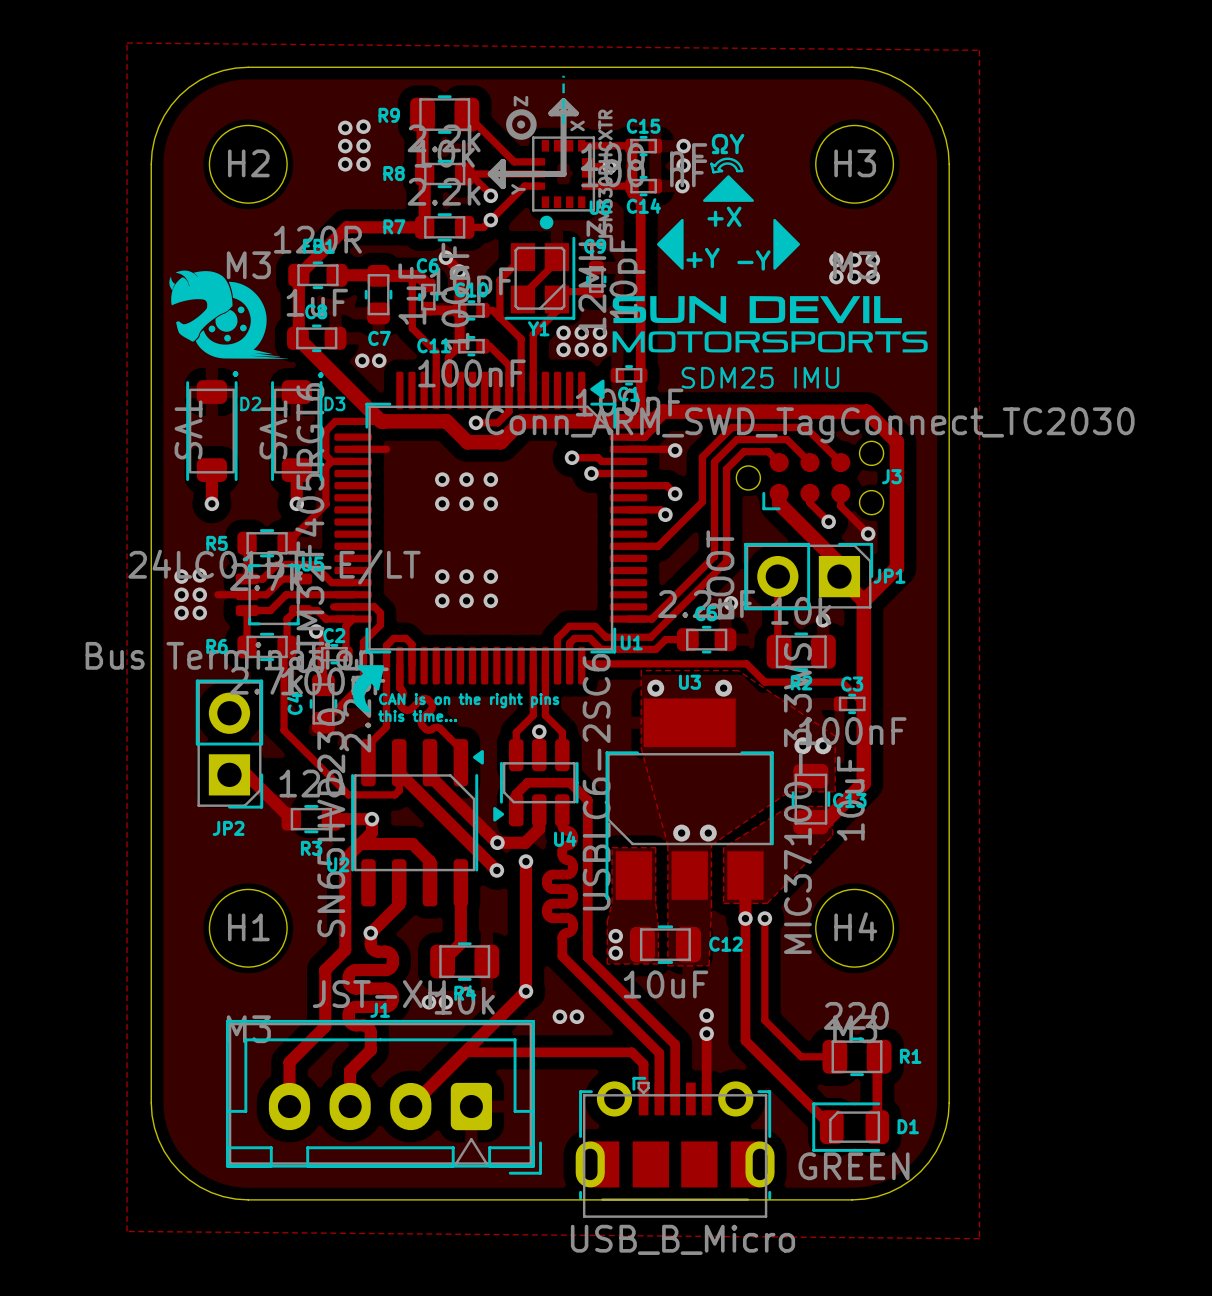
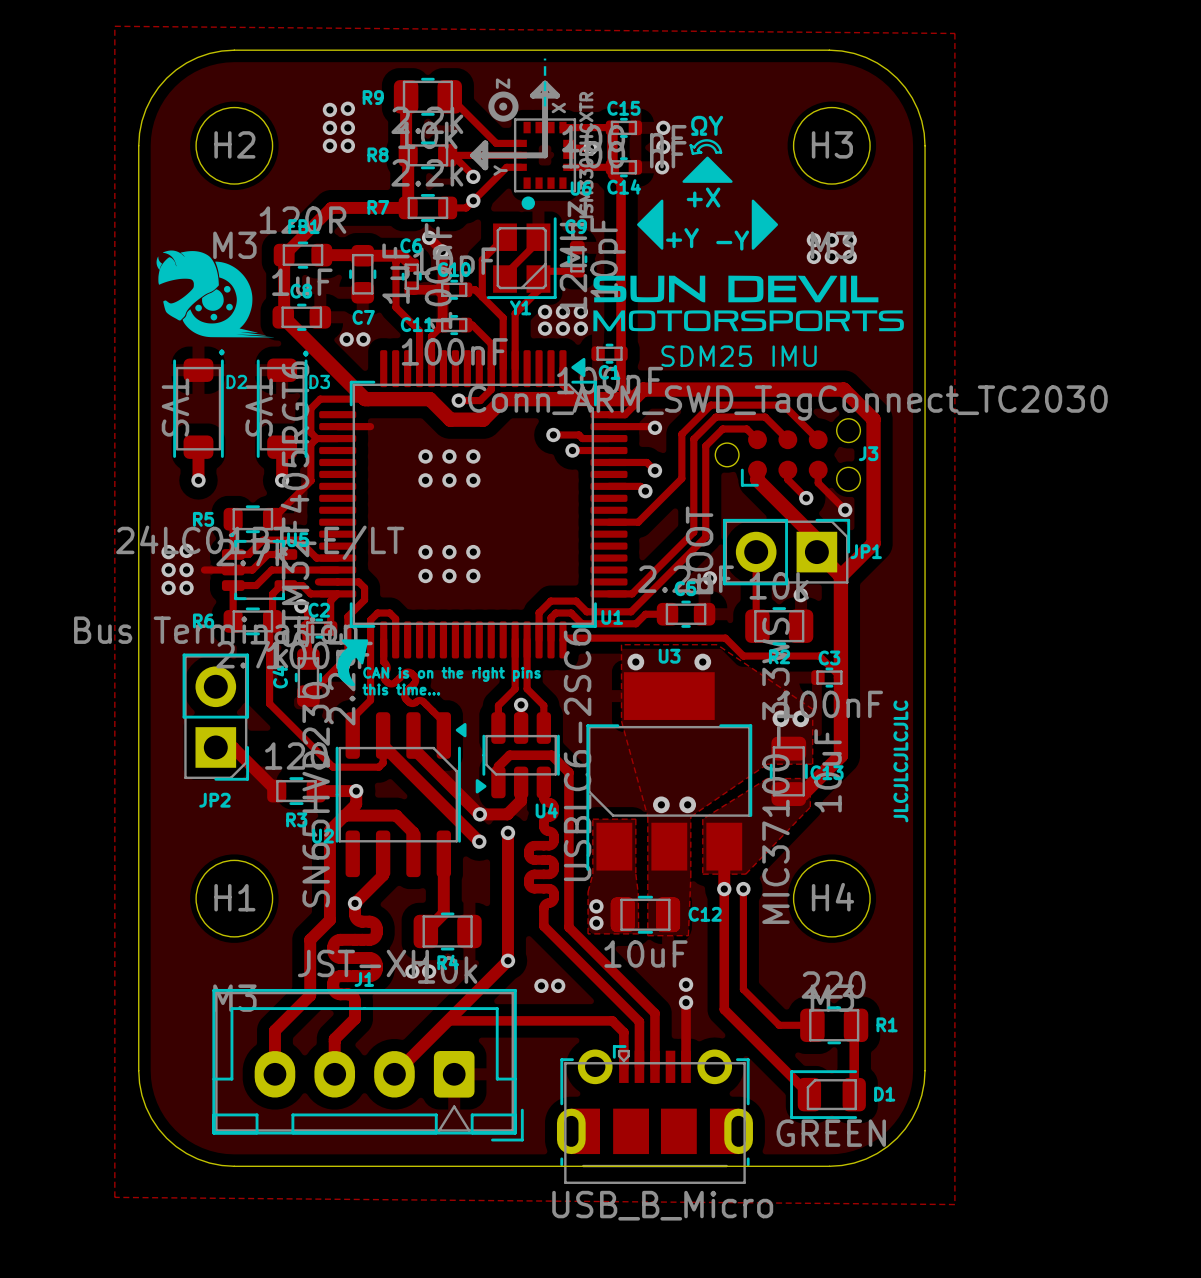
text: none -> JLCJLCJLCJLC (900, 761)

